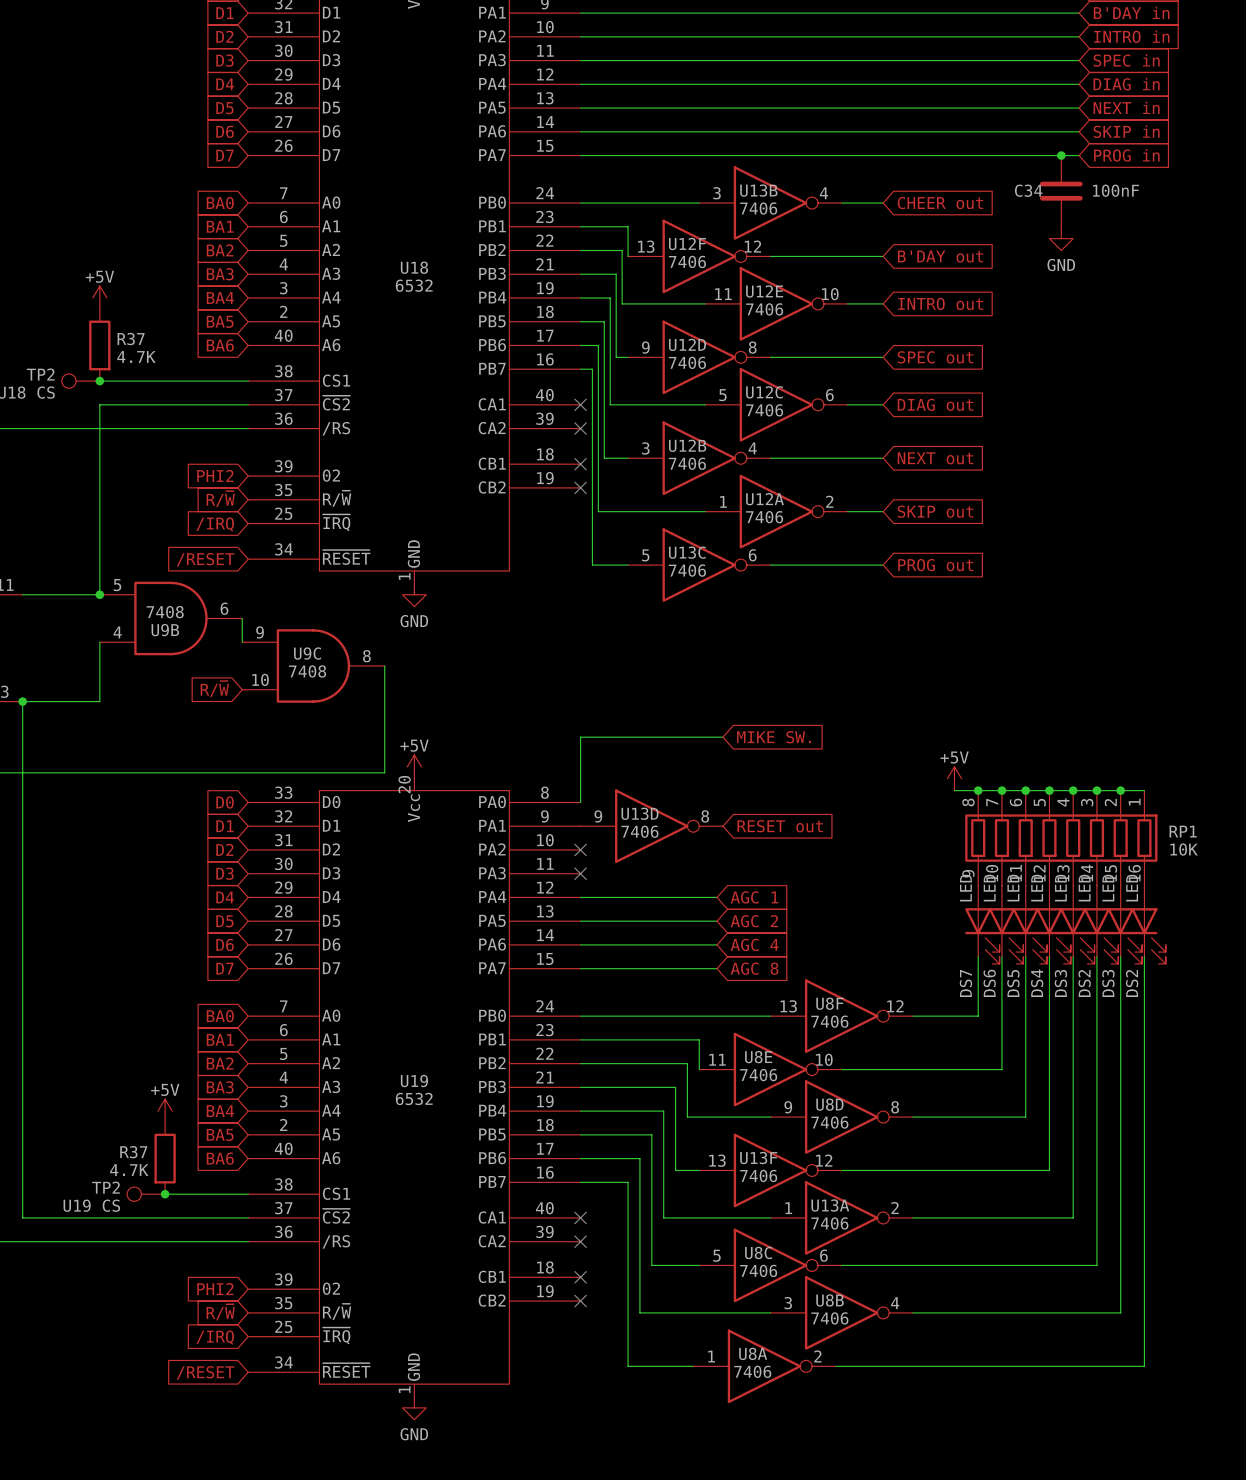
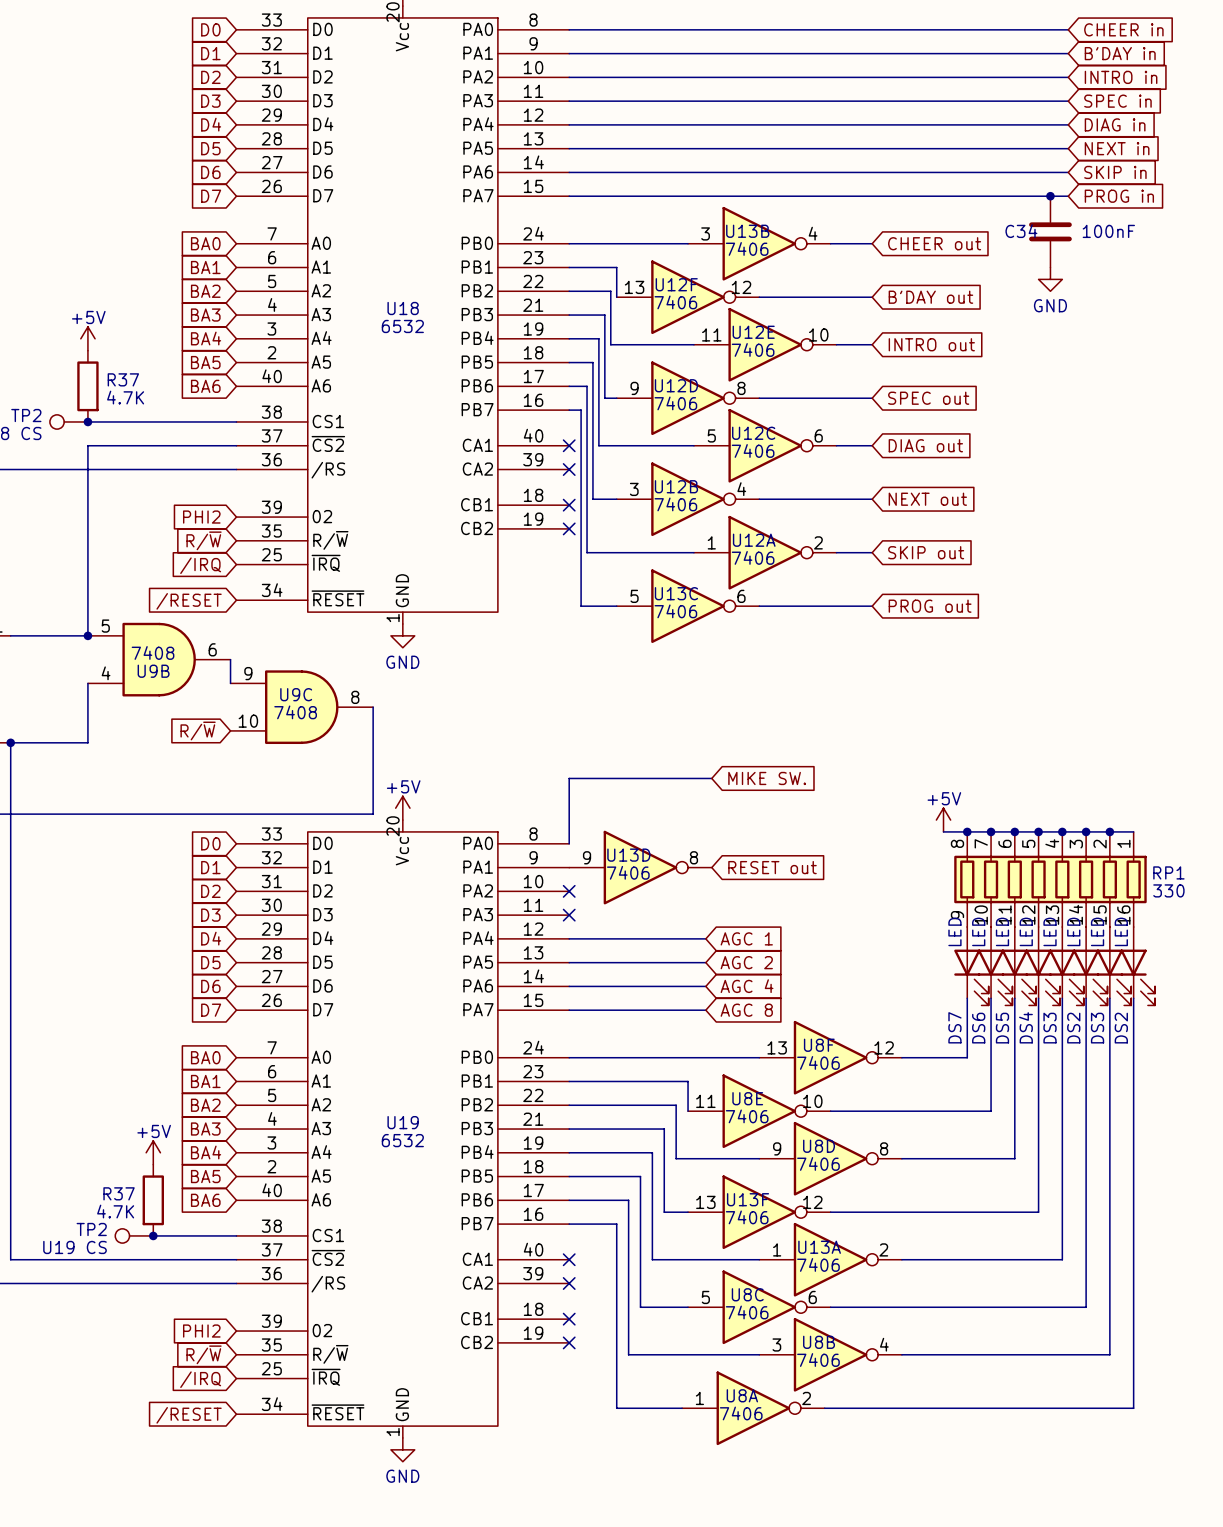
RP1 value: 10K (1184, 849) -> 330 (1168, 890)

